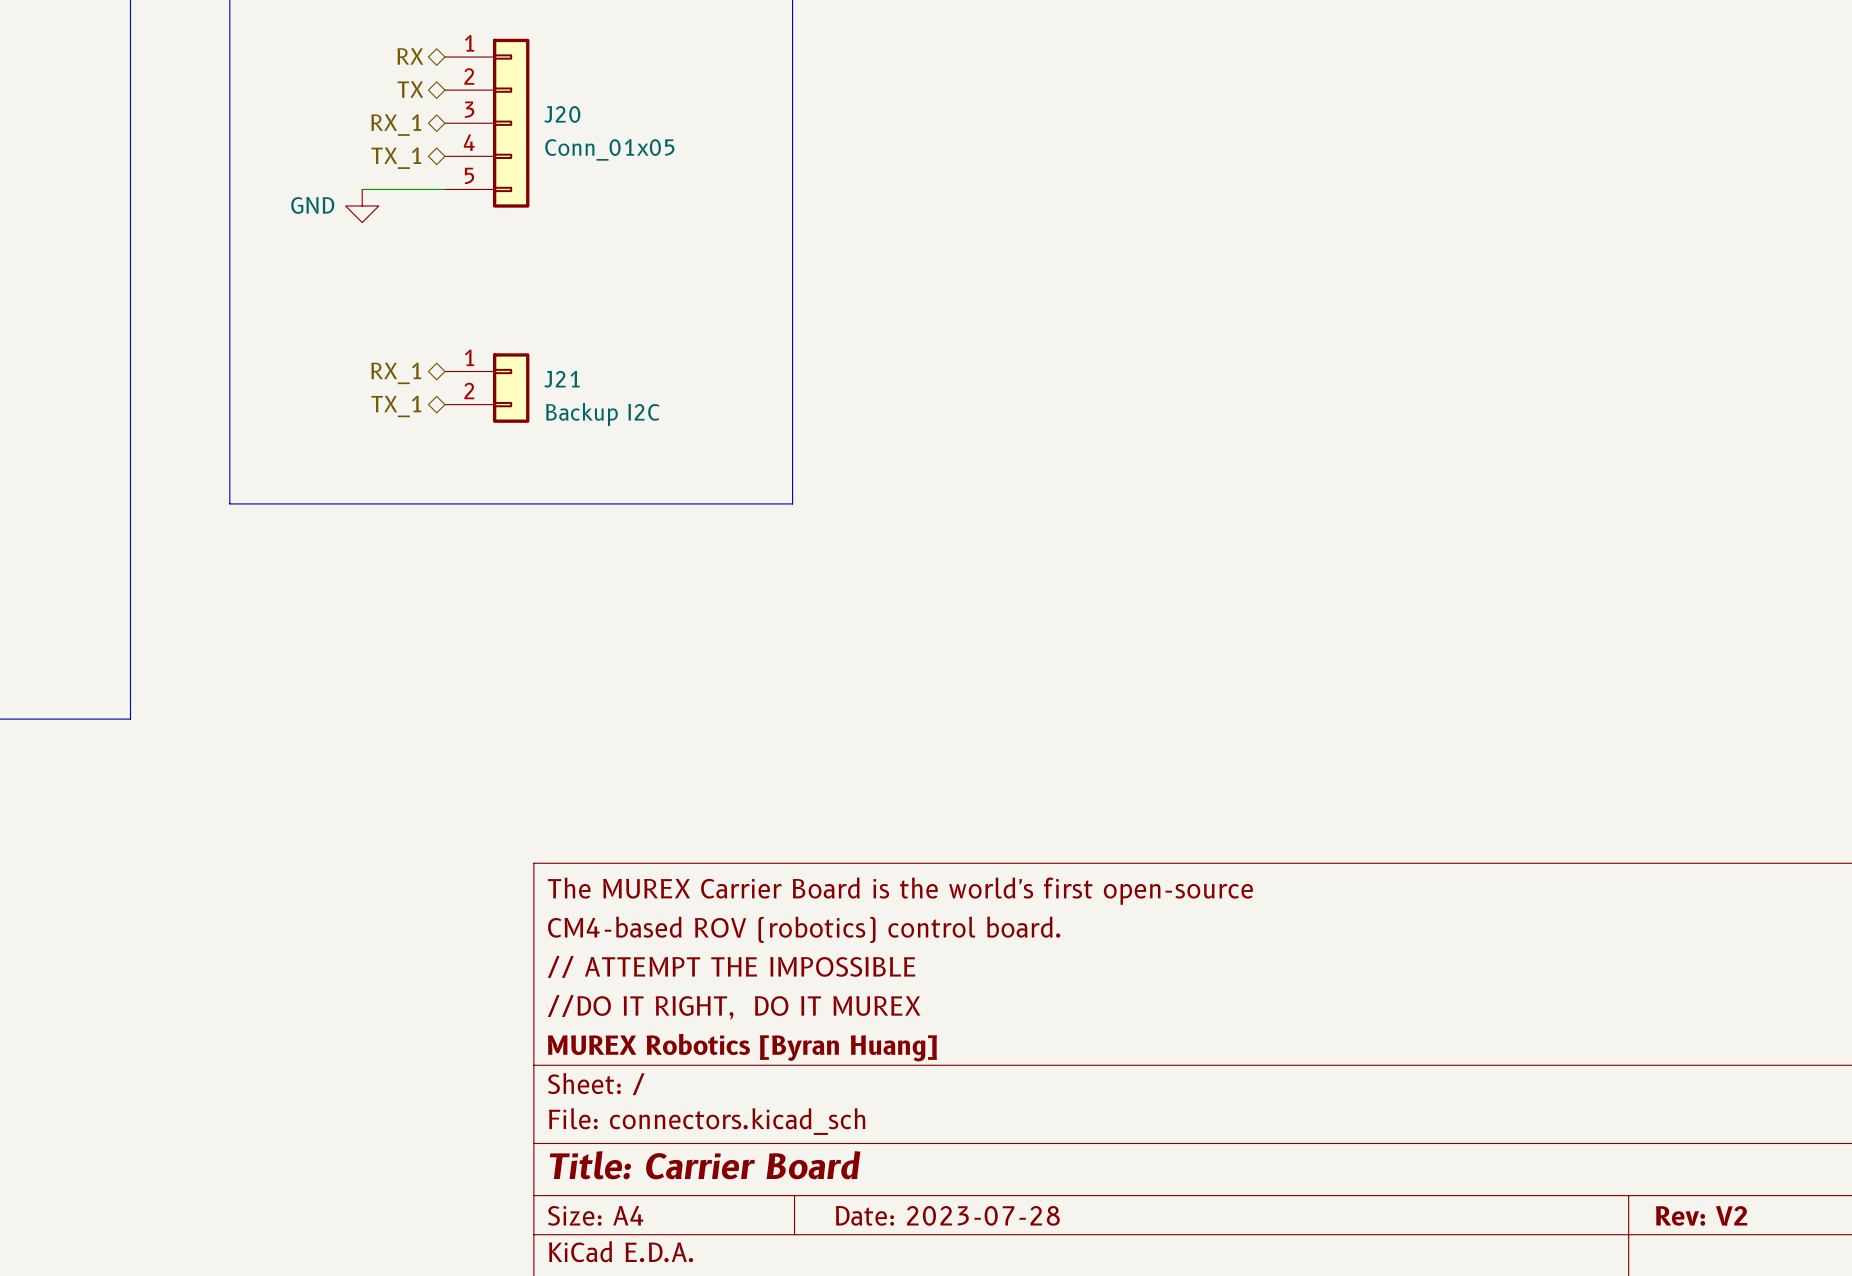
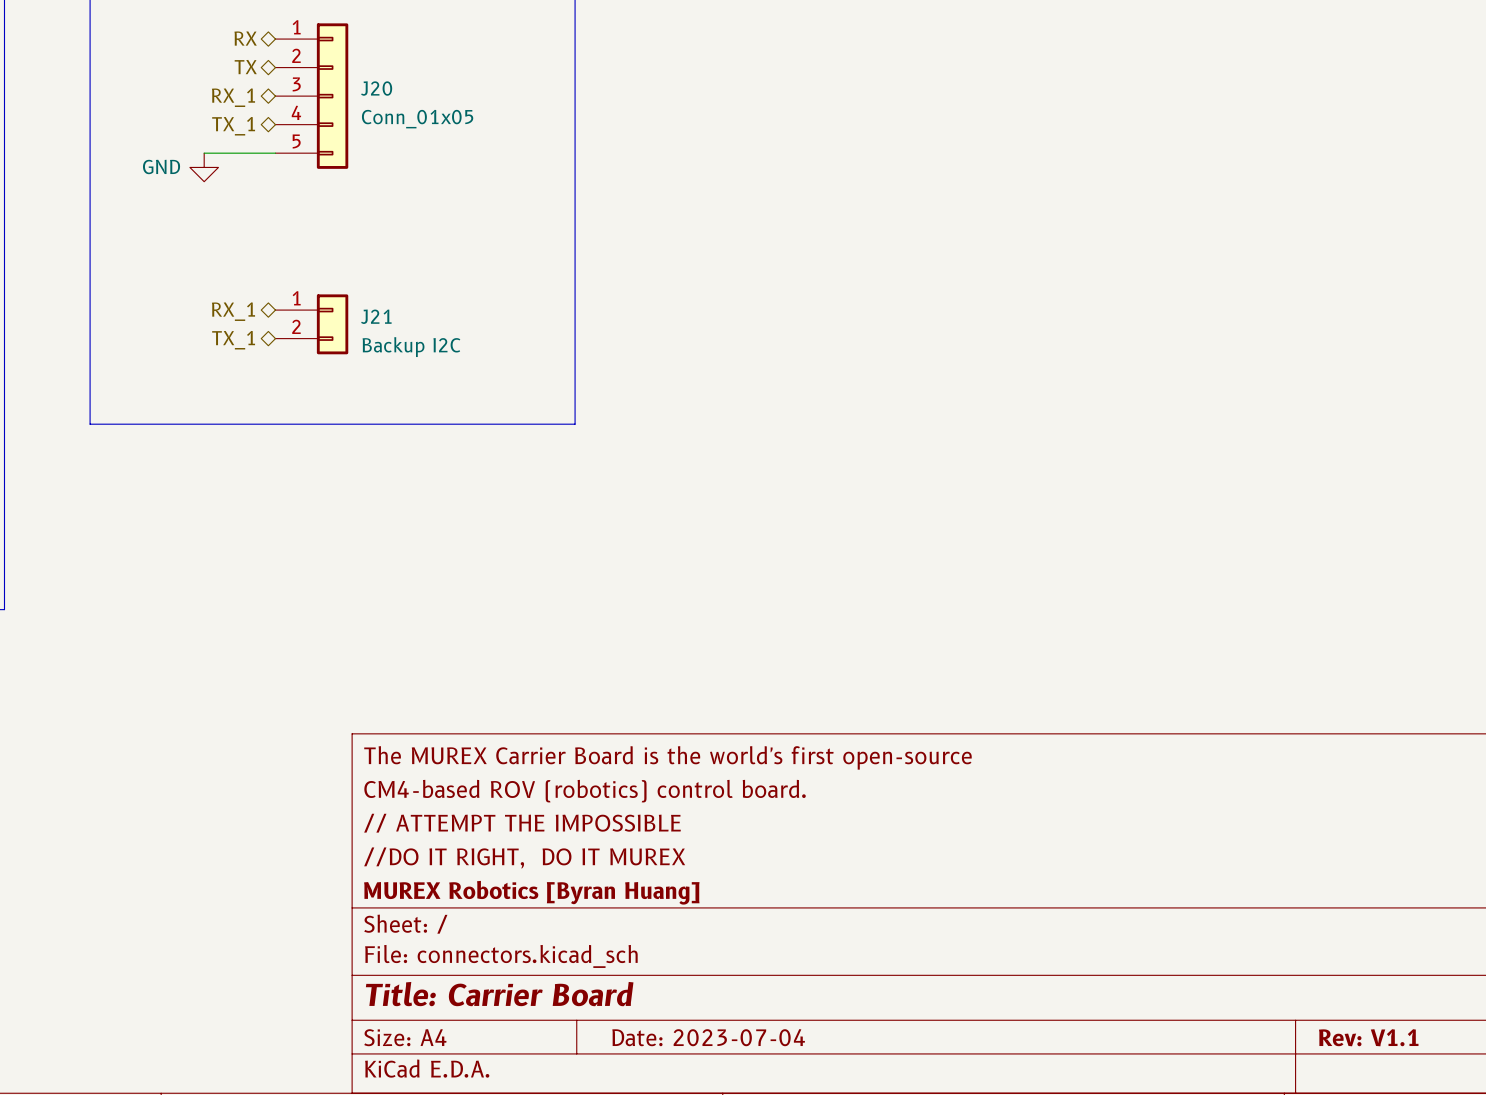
title block: Date: 2023-07-28 (947, 1215) -> Date: 2023-07-04 (708, 1037)
title block: Rev: V2 (1701, 1215) -> Rev: V1.1 (1368, 1037)

